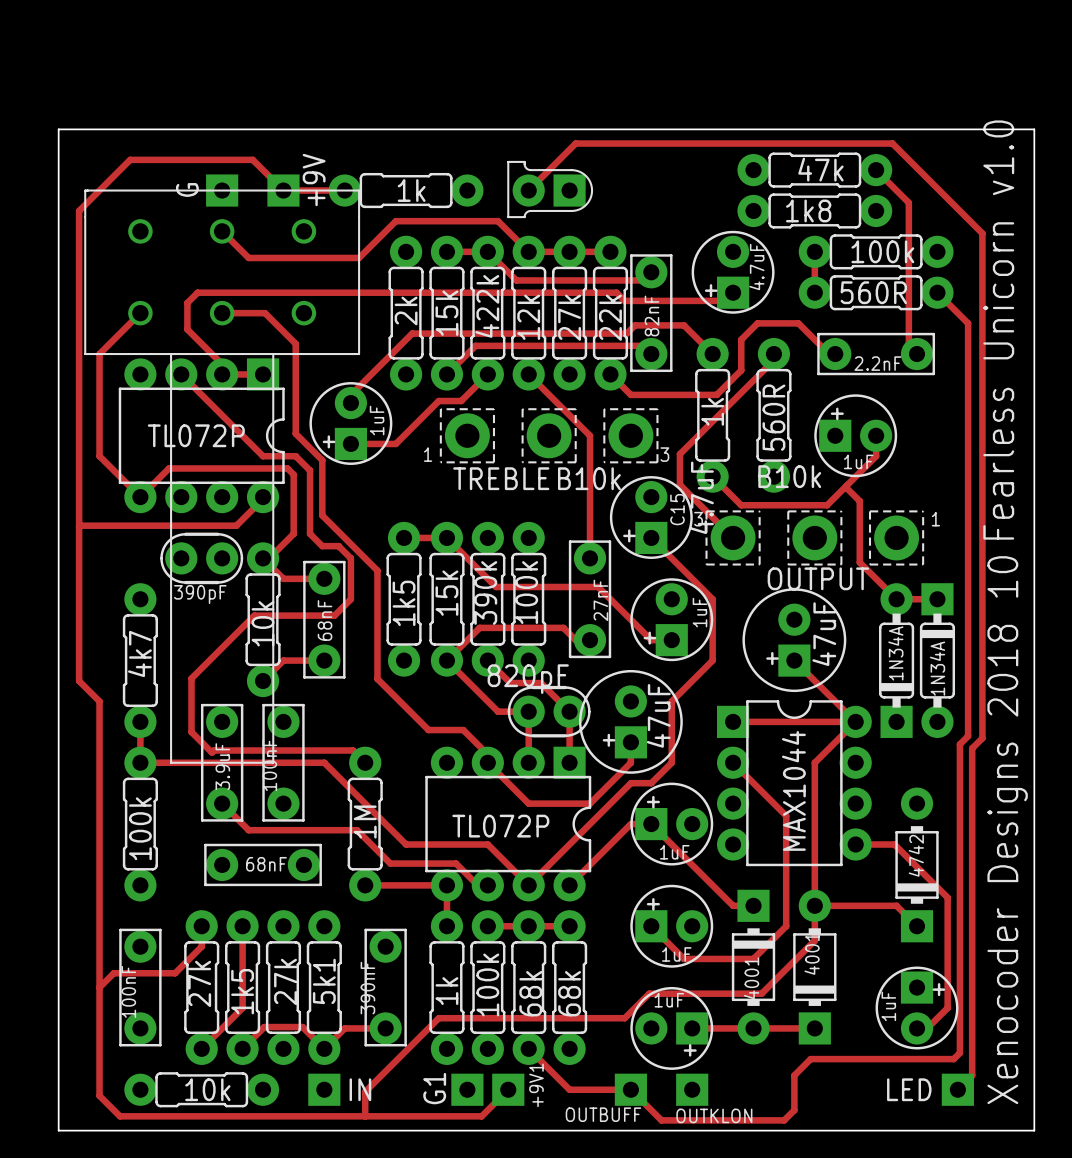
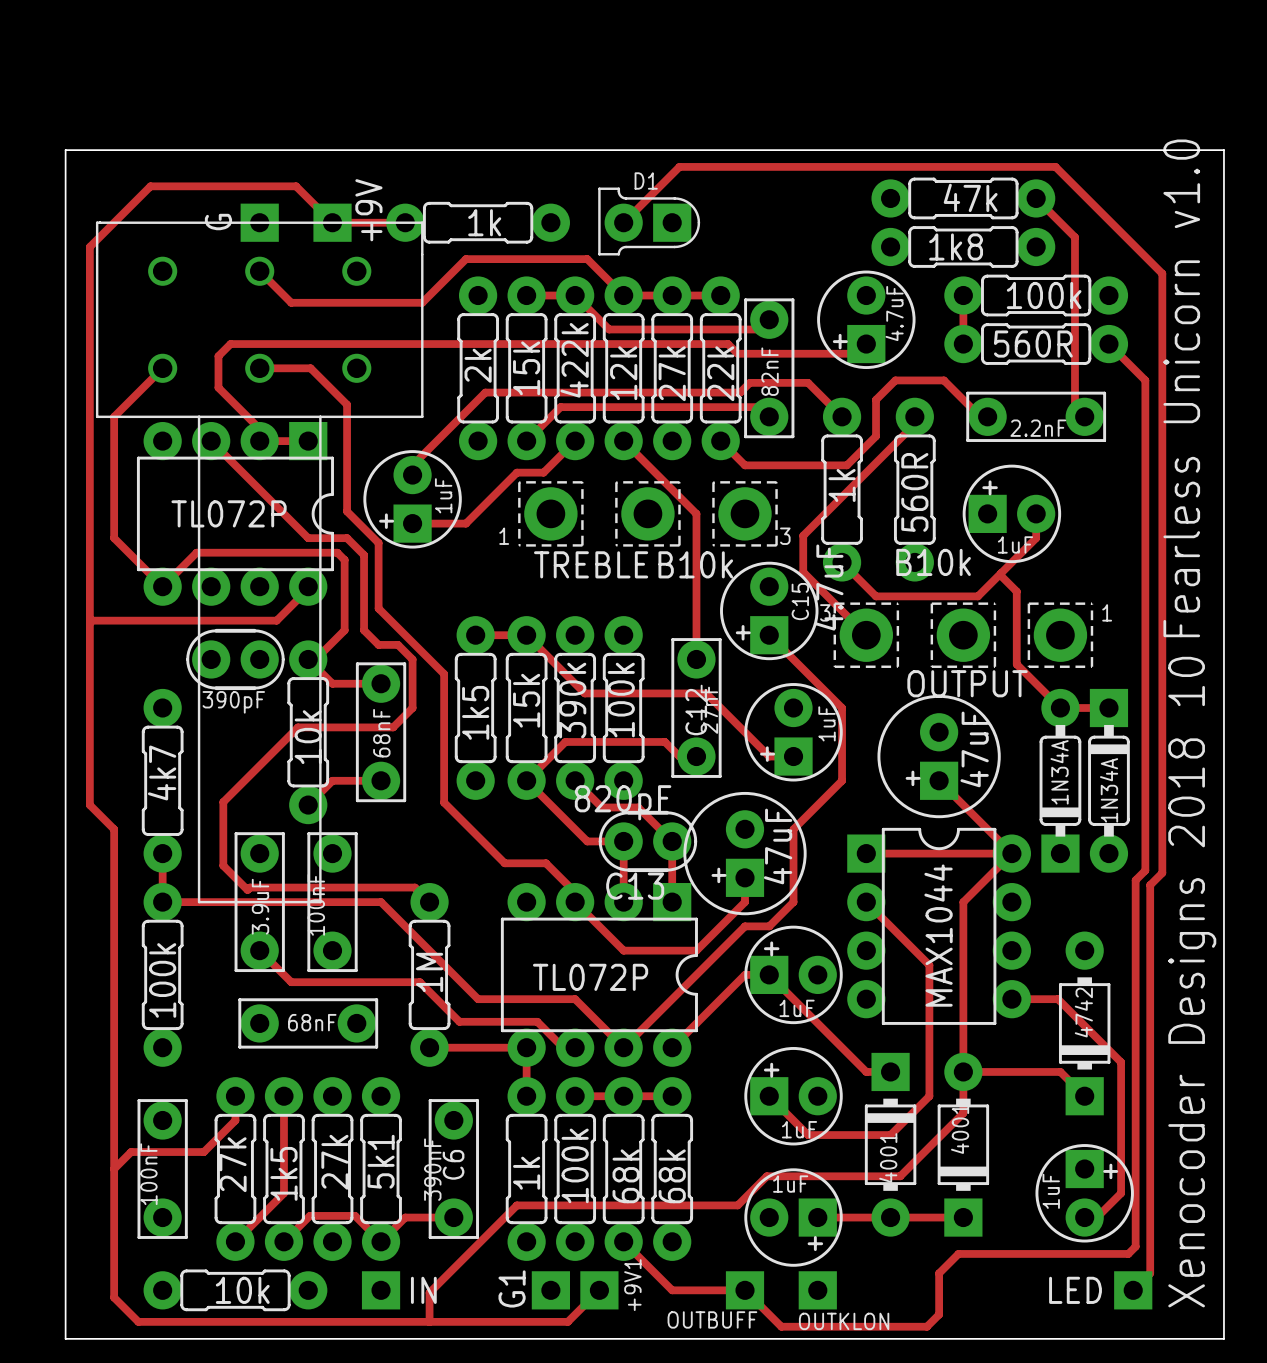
D1 name: none -> D1 (646, 180)
C12 name: none -> C12 (696, 712)
C13 name: none -> C13 (635, 886)
C6 name: none -> C6 (453, 1164)

